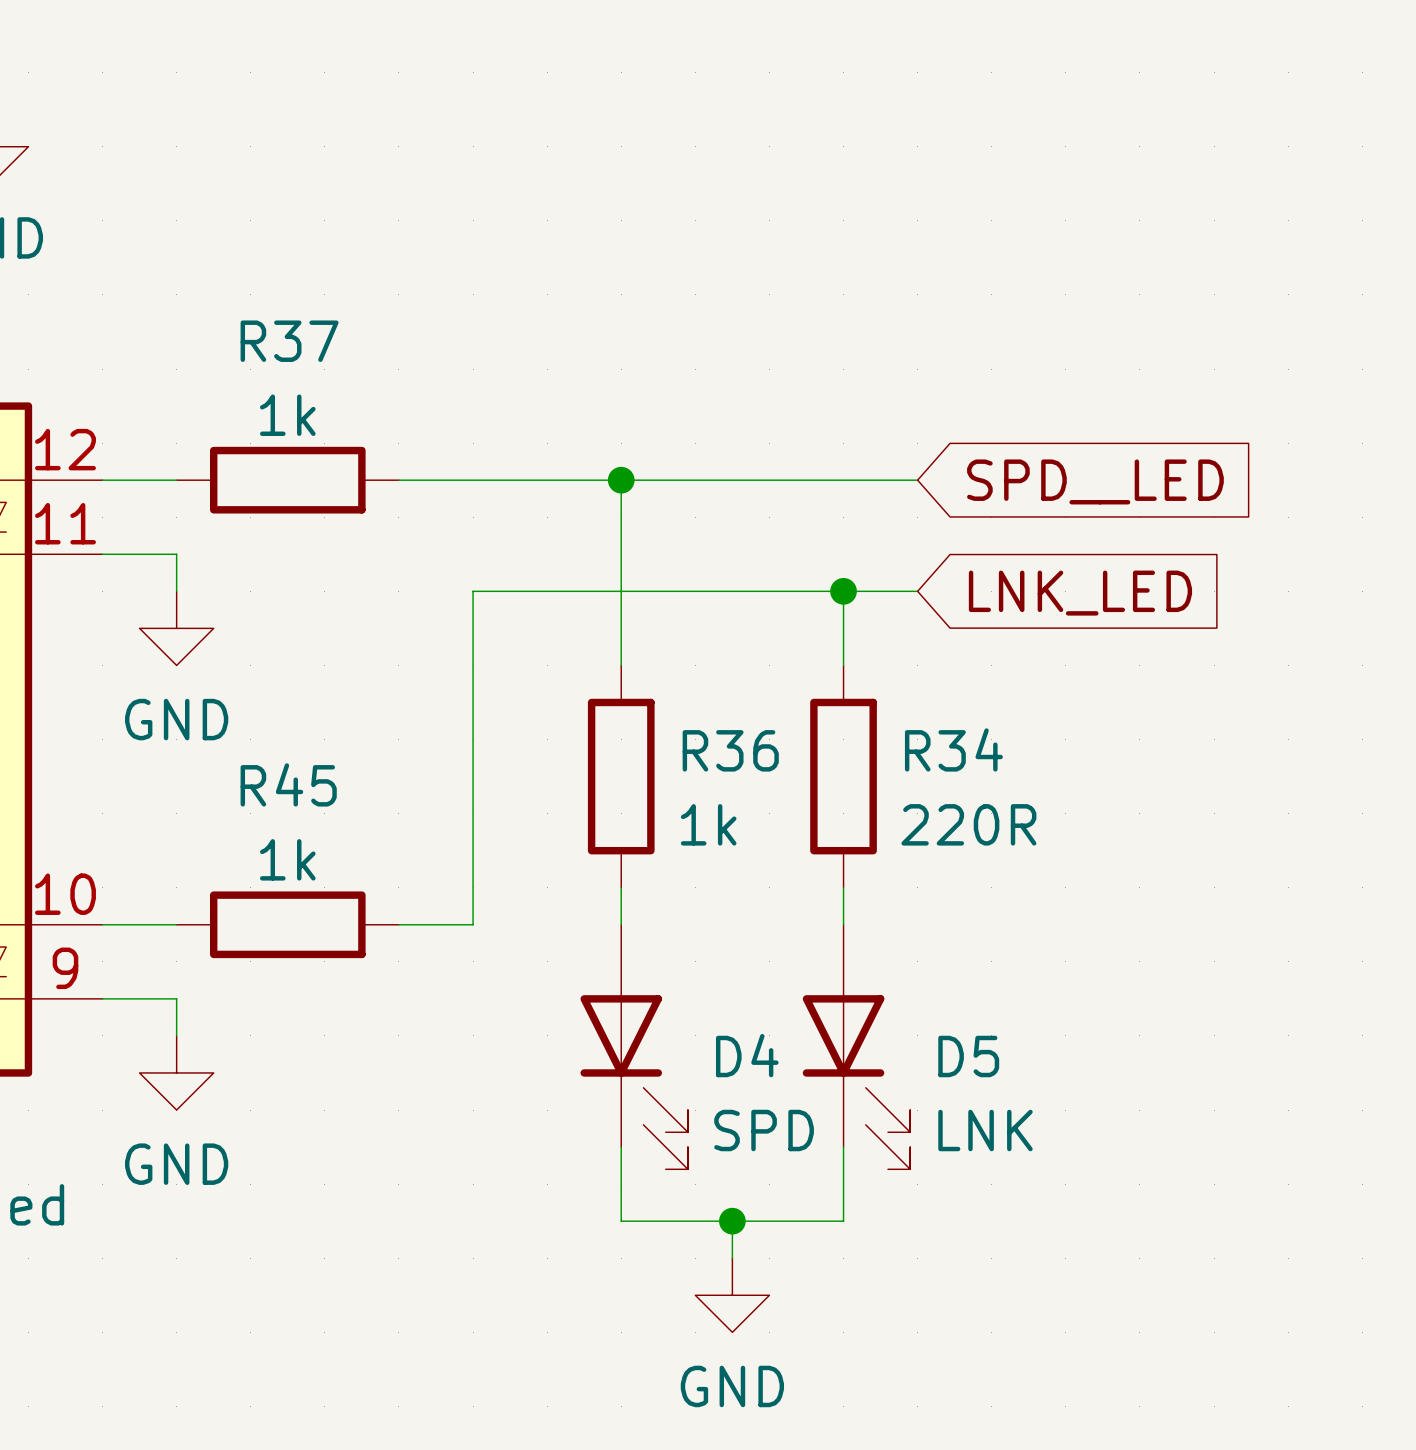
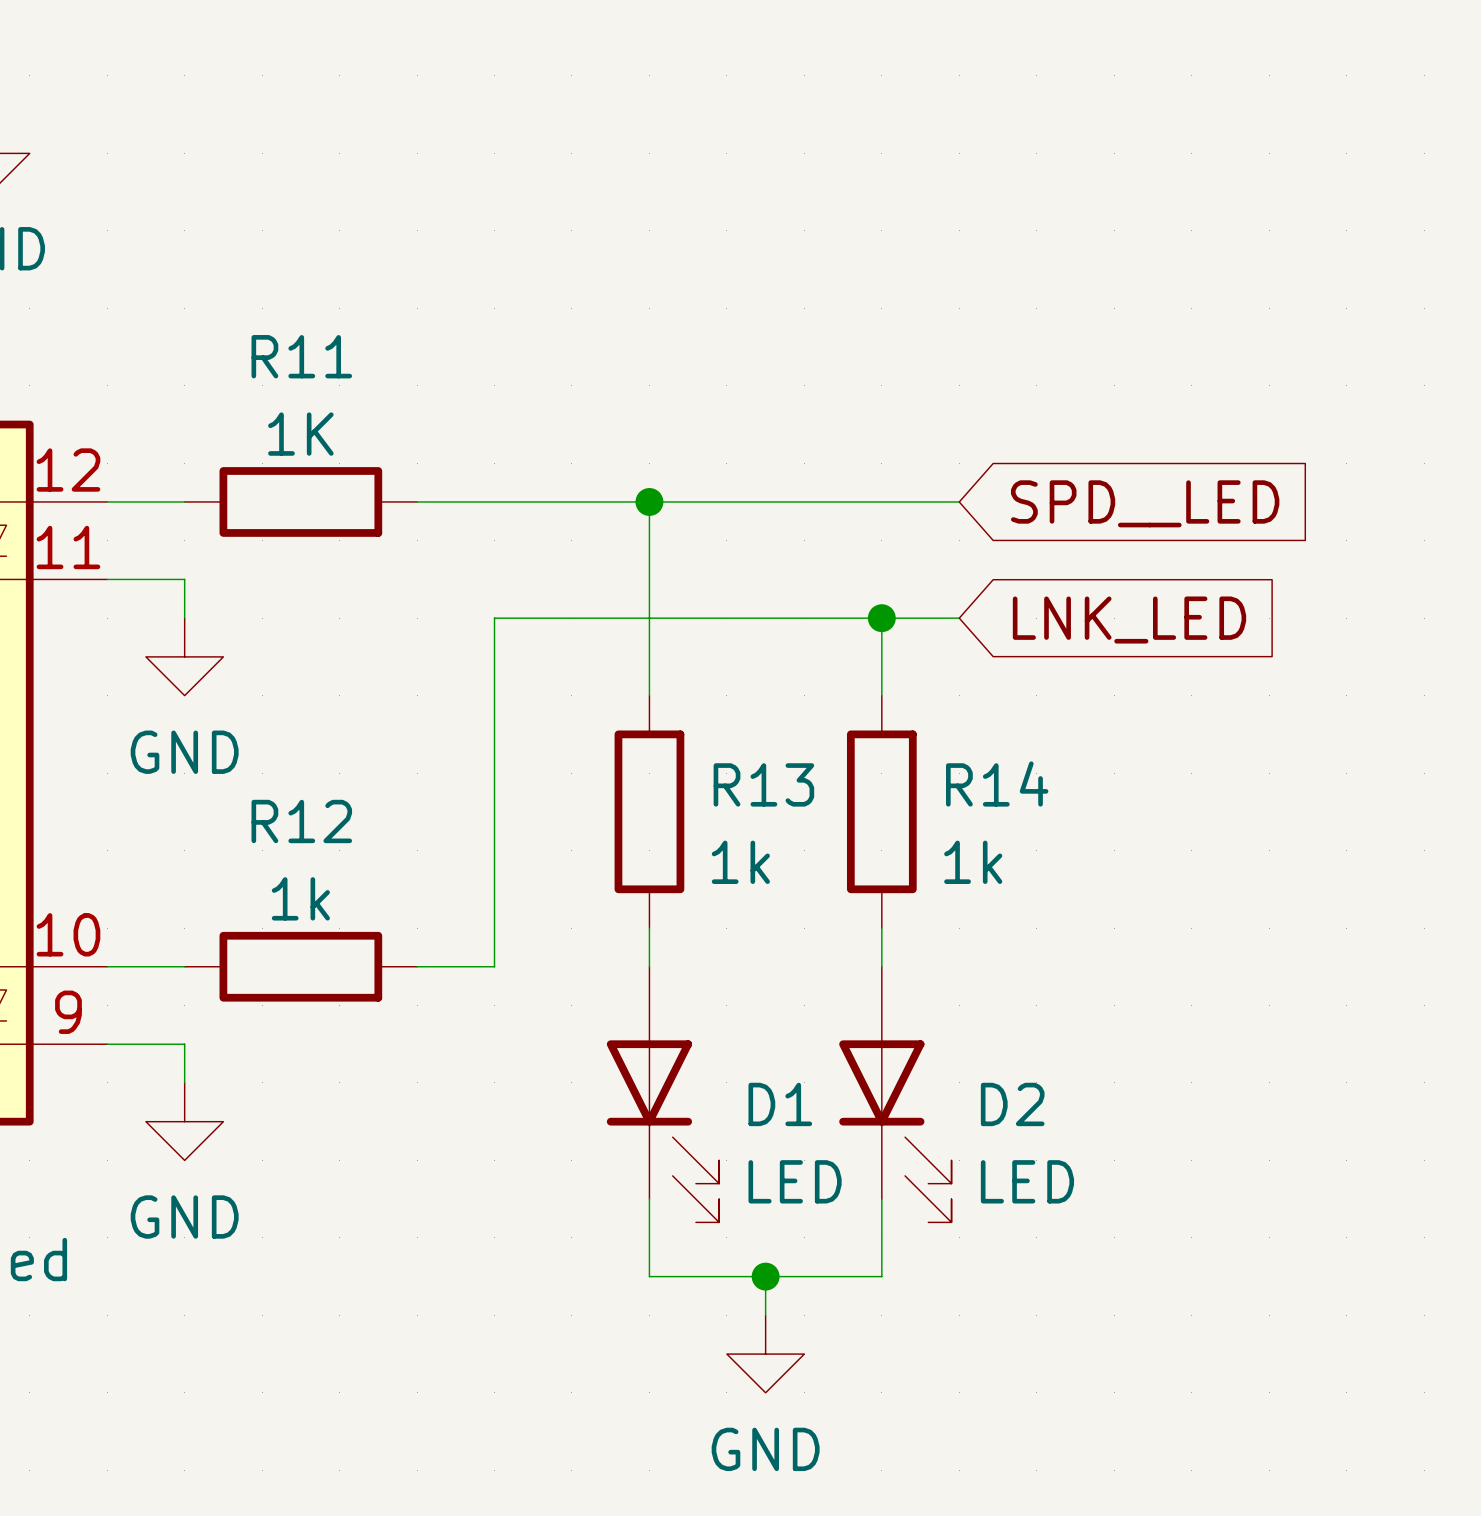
R37 name: R37 (289, 341) -> R11 (301, 356)
R37 value: 1k (287, 415) -> 1K (300, 434)
R34 name: R34 (953, 749) -> R14 (997, 784)
R36 name: R36 (730, 750) -> R13 (763, 784)
R45 name: R45 (288, 784) -> R12 (301, 821)
R34 value: 220R (968, 824) -> 1k (973, 862)
D4 name: D4 (747, 1055) -> D1 (780, 1104)
D5 name: D5 (968, 1056) -> D2 (1012, 1104)
D4 value: SPD (764, 1130) -> LED (795, 1181)
D5 value: LNK (985, 1130) -> LED (1027, 1181)

